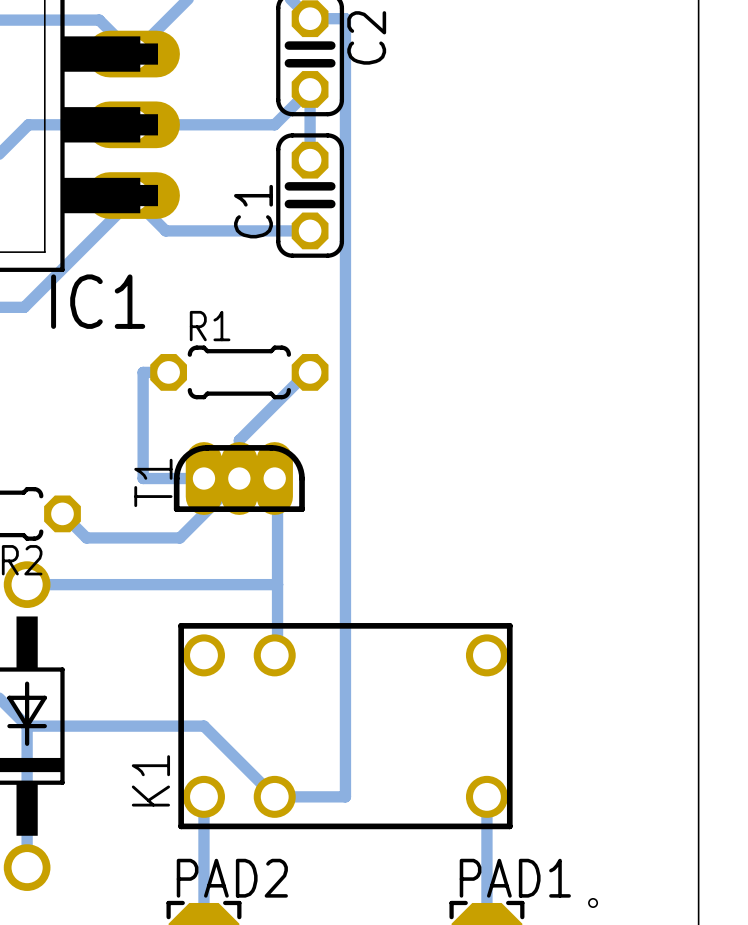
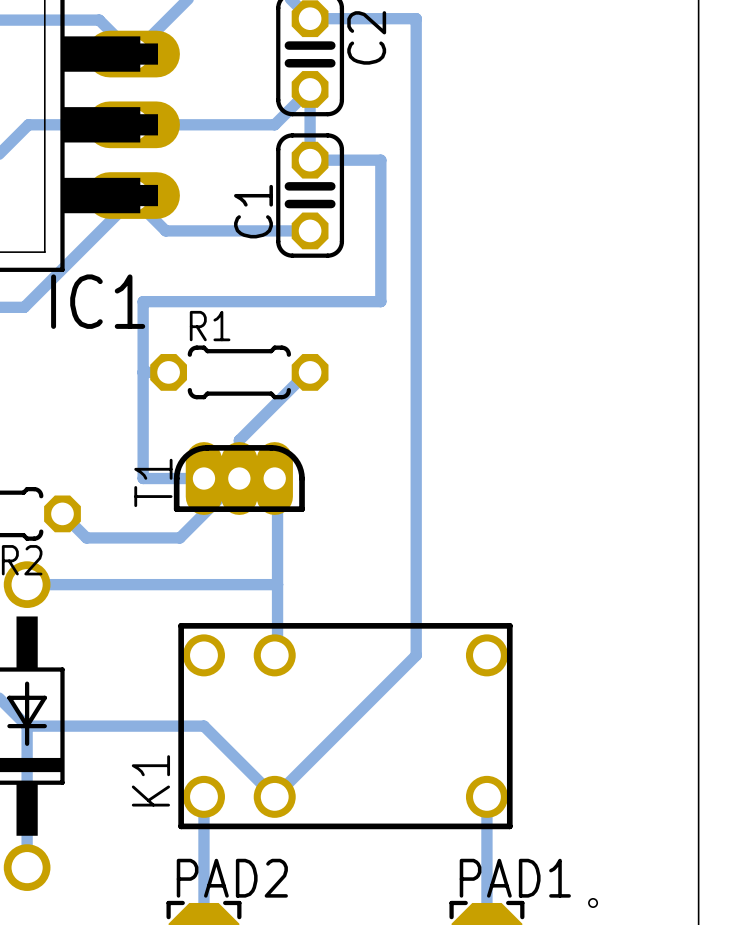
bottom track: (345, 18) (345, 796) (274, 796) -> (345, 18) (416, 18) (416, 655) (274, 796)
bottom track: none -> (310, 160) (380, 160) (380, 301) (143, 301) (143, 372)

